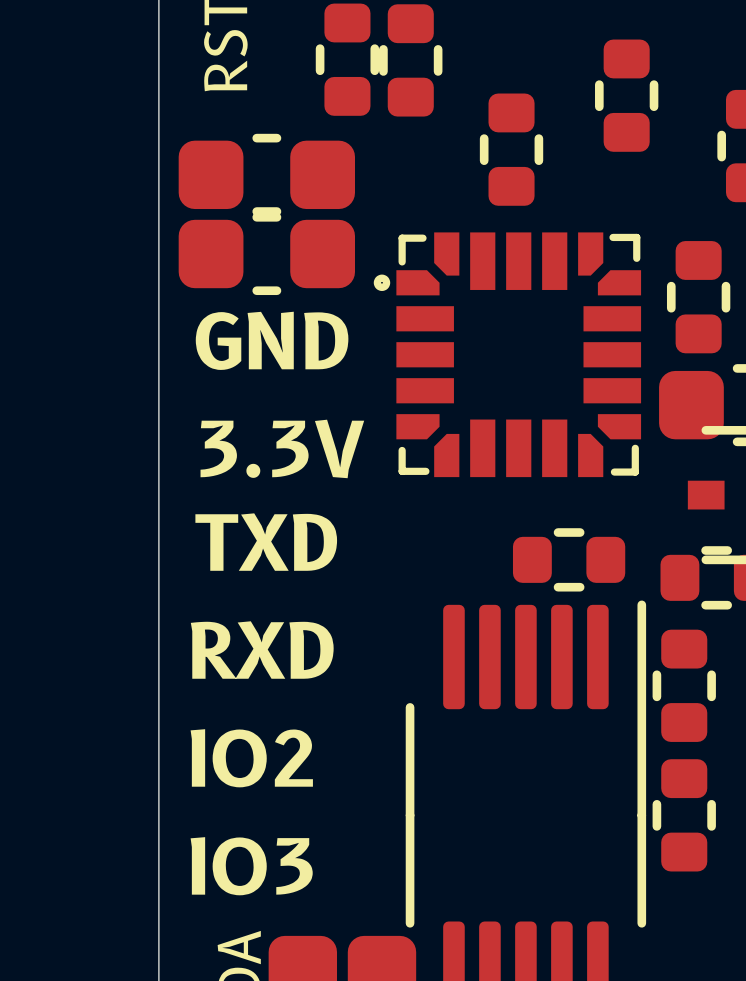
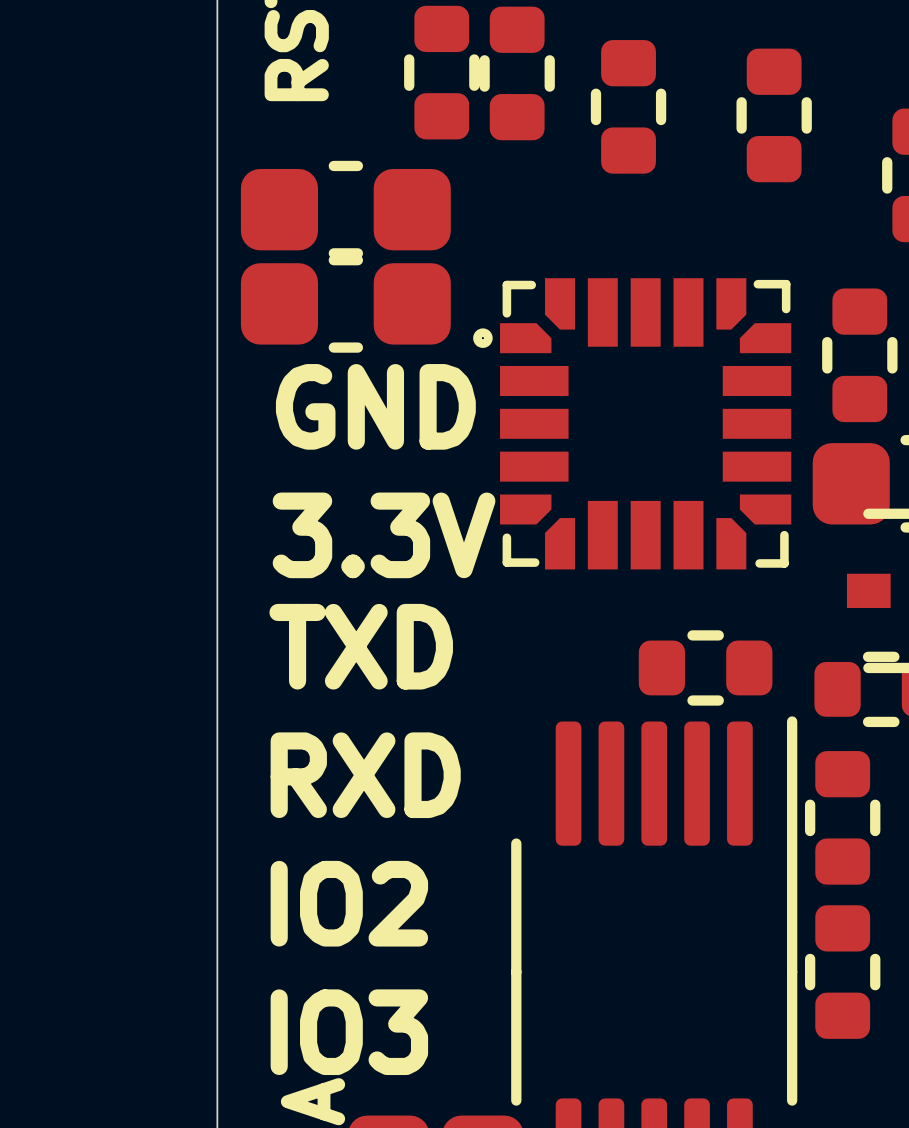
part position: (511, 149) -> (628, 106)

